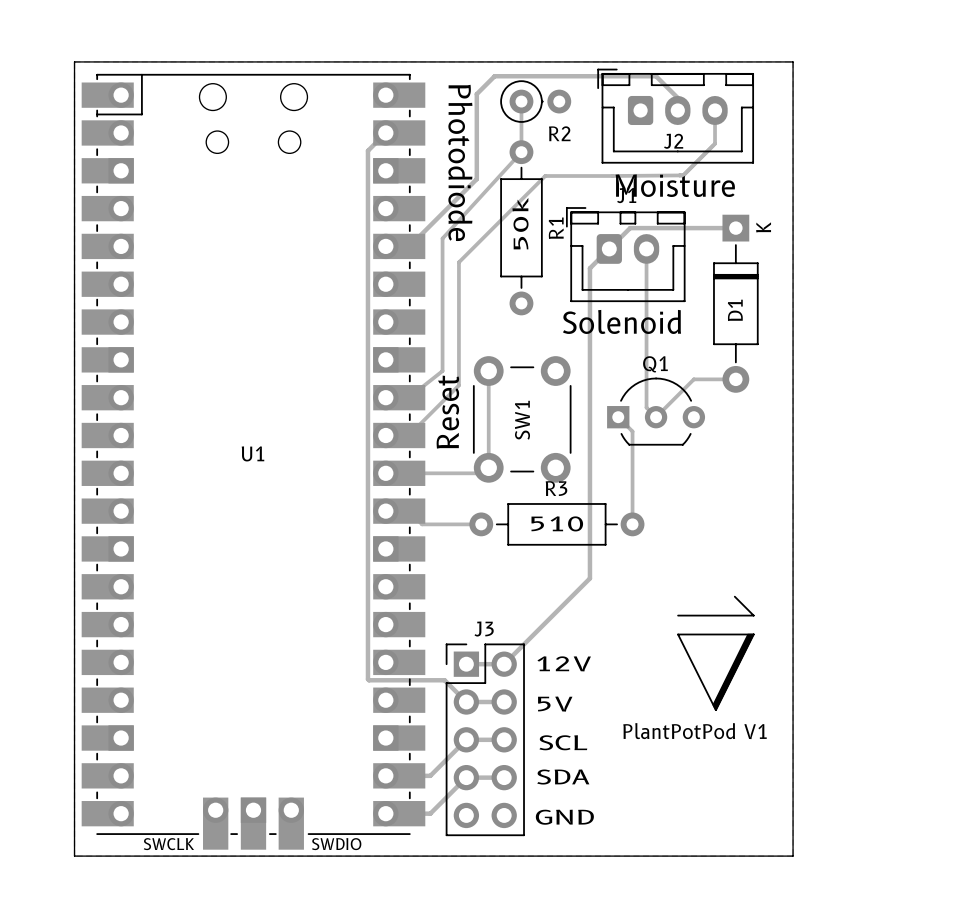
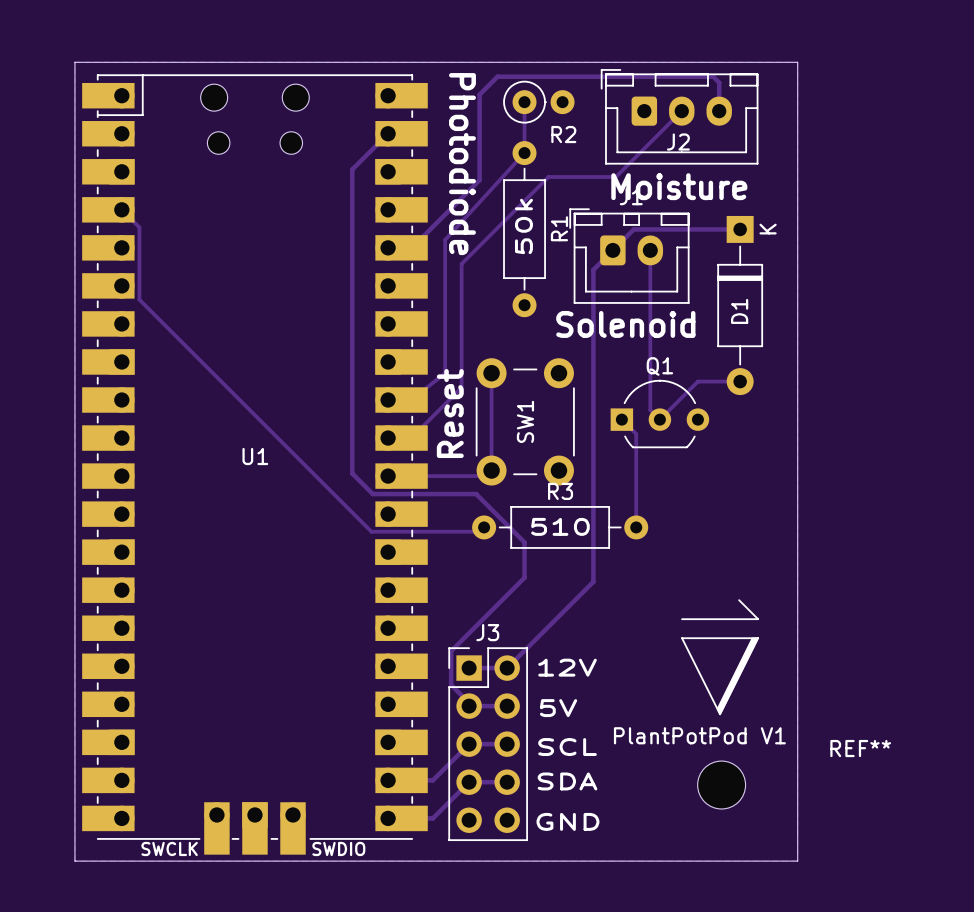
track: (656, 76) (677, 97) (677, 110) -> (659, 76) (713, 76) (719, 82) (719, 111)
track: (715, 110) (715, 143) (683, 175) -> none
track: (367, 150) (367, 679) (444, 680) (466, 702) -> (370, 151) (352, 169) (352, 473) (372, 494) (476, 494) (524, 542) (524, 577) (451, 651) (451, 684) (472, 706)
track: (683, 175) (612, 175) -> (681, 111) (615, 177)
track: none -> (121, 209) (139, 227) (139, 299) (371, 531) (479, 531)
track: (385, 511) (408, 511) (422, 524) (481, 524) -> none
REF**: none -> (721, 785)

